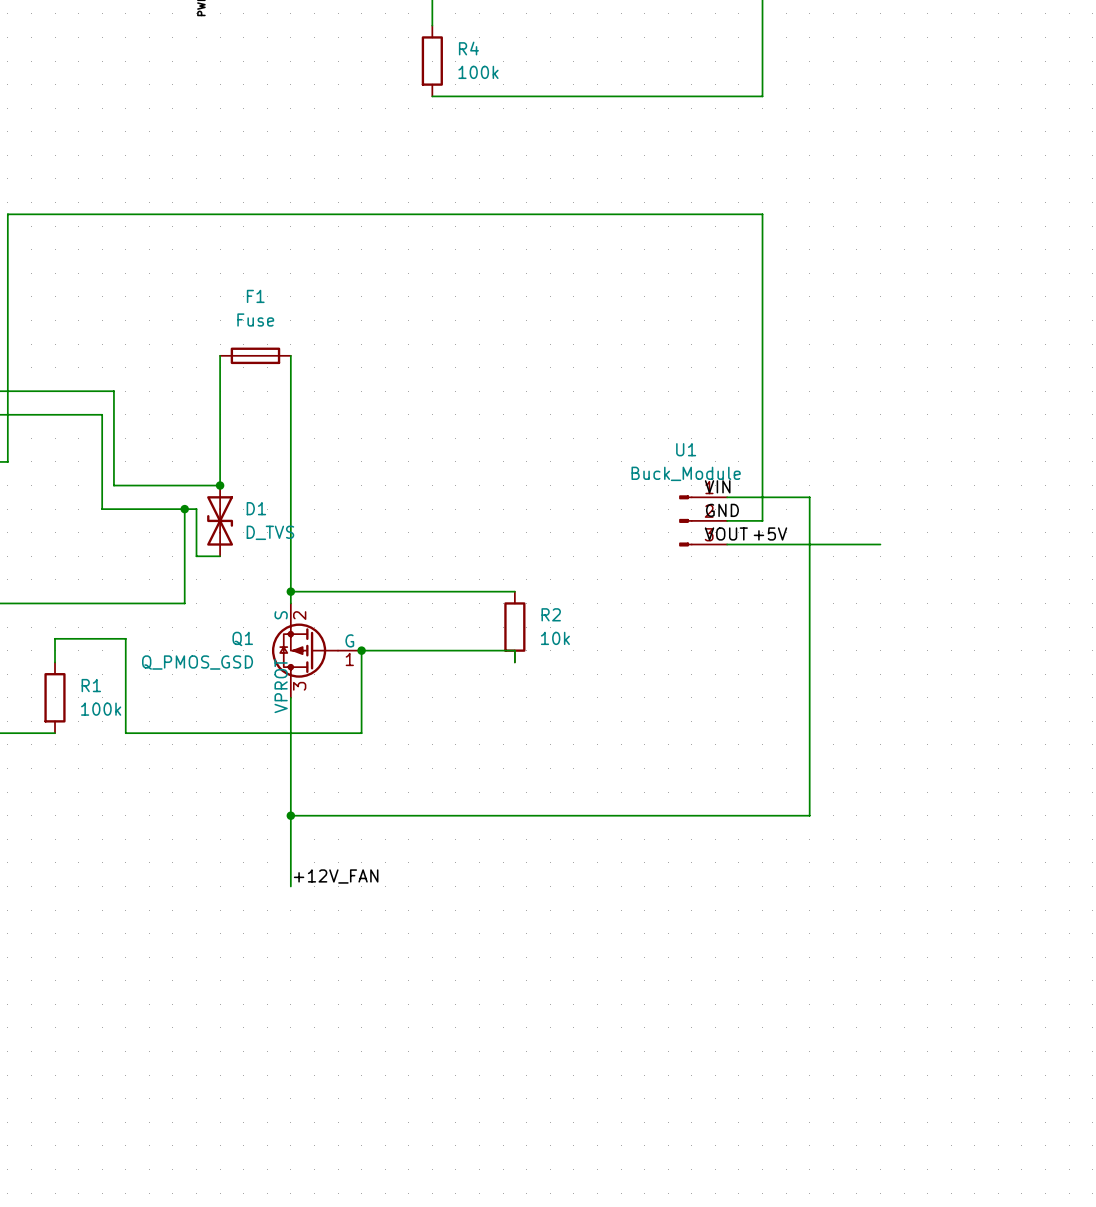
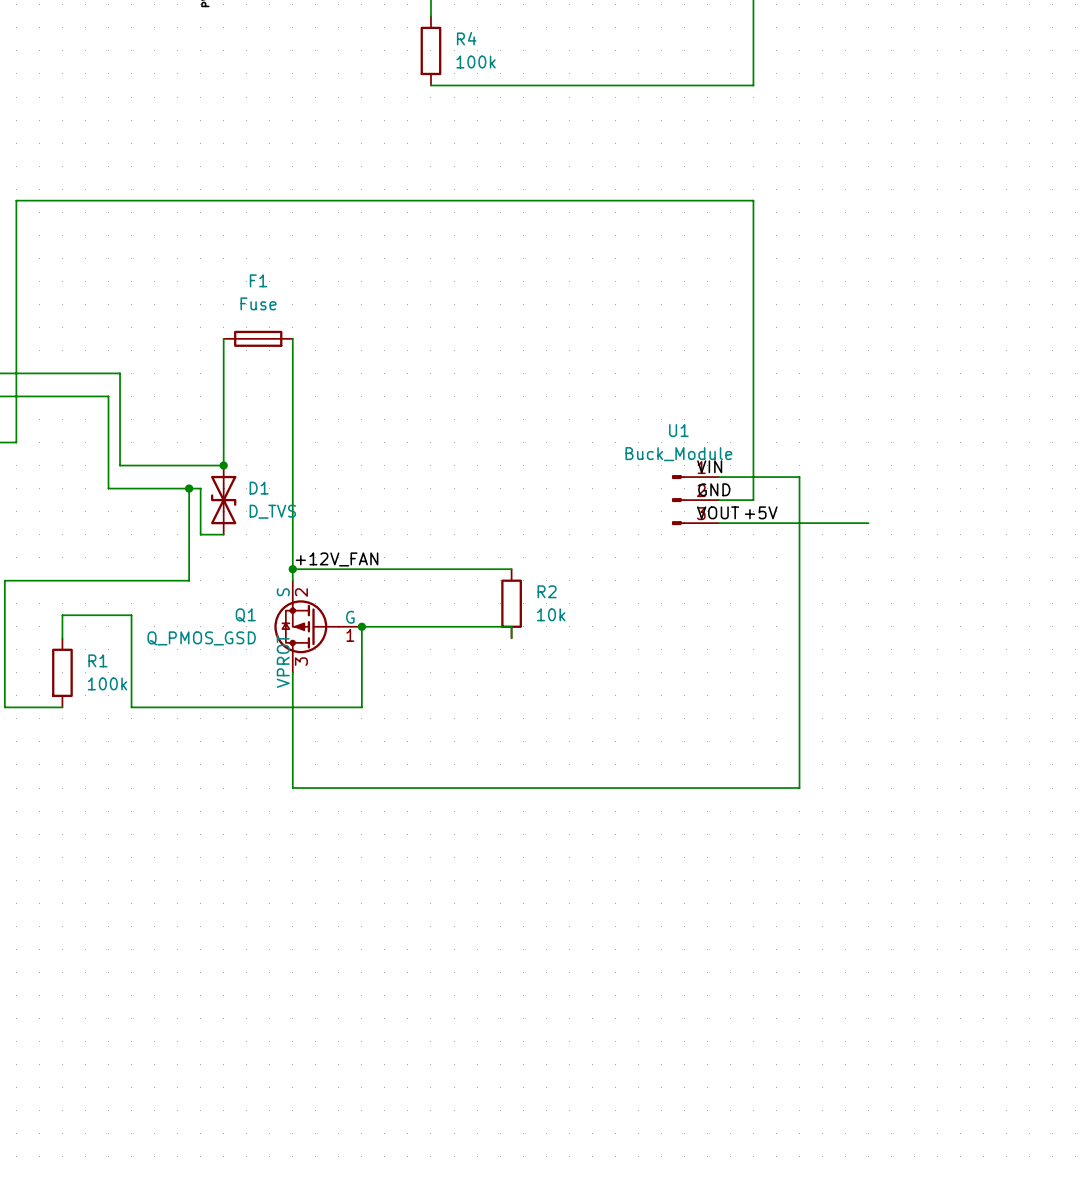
label: none -> +12V_FAN (337, 559)
wire: (290, 815) (290, 886) -> none
junction: (290, 815) -> none
label: +12V_FAN (336, 876) -> none

